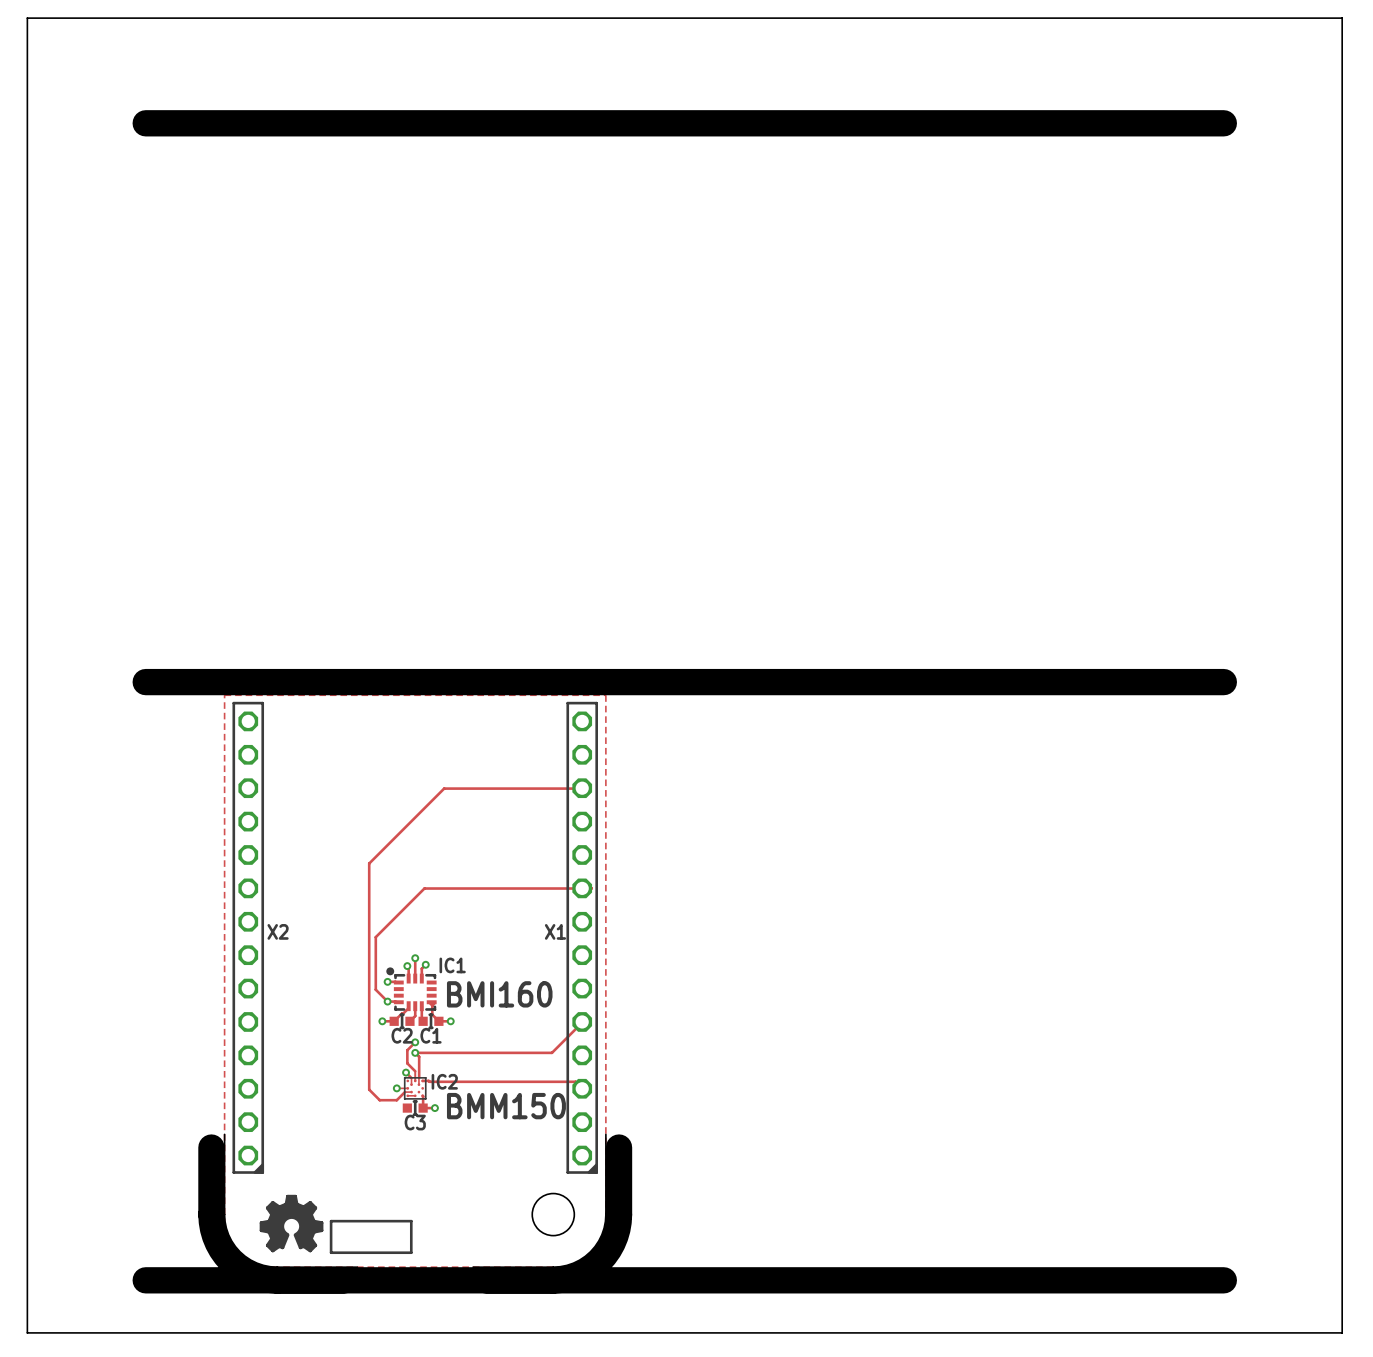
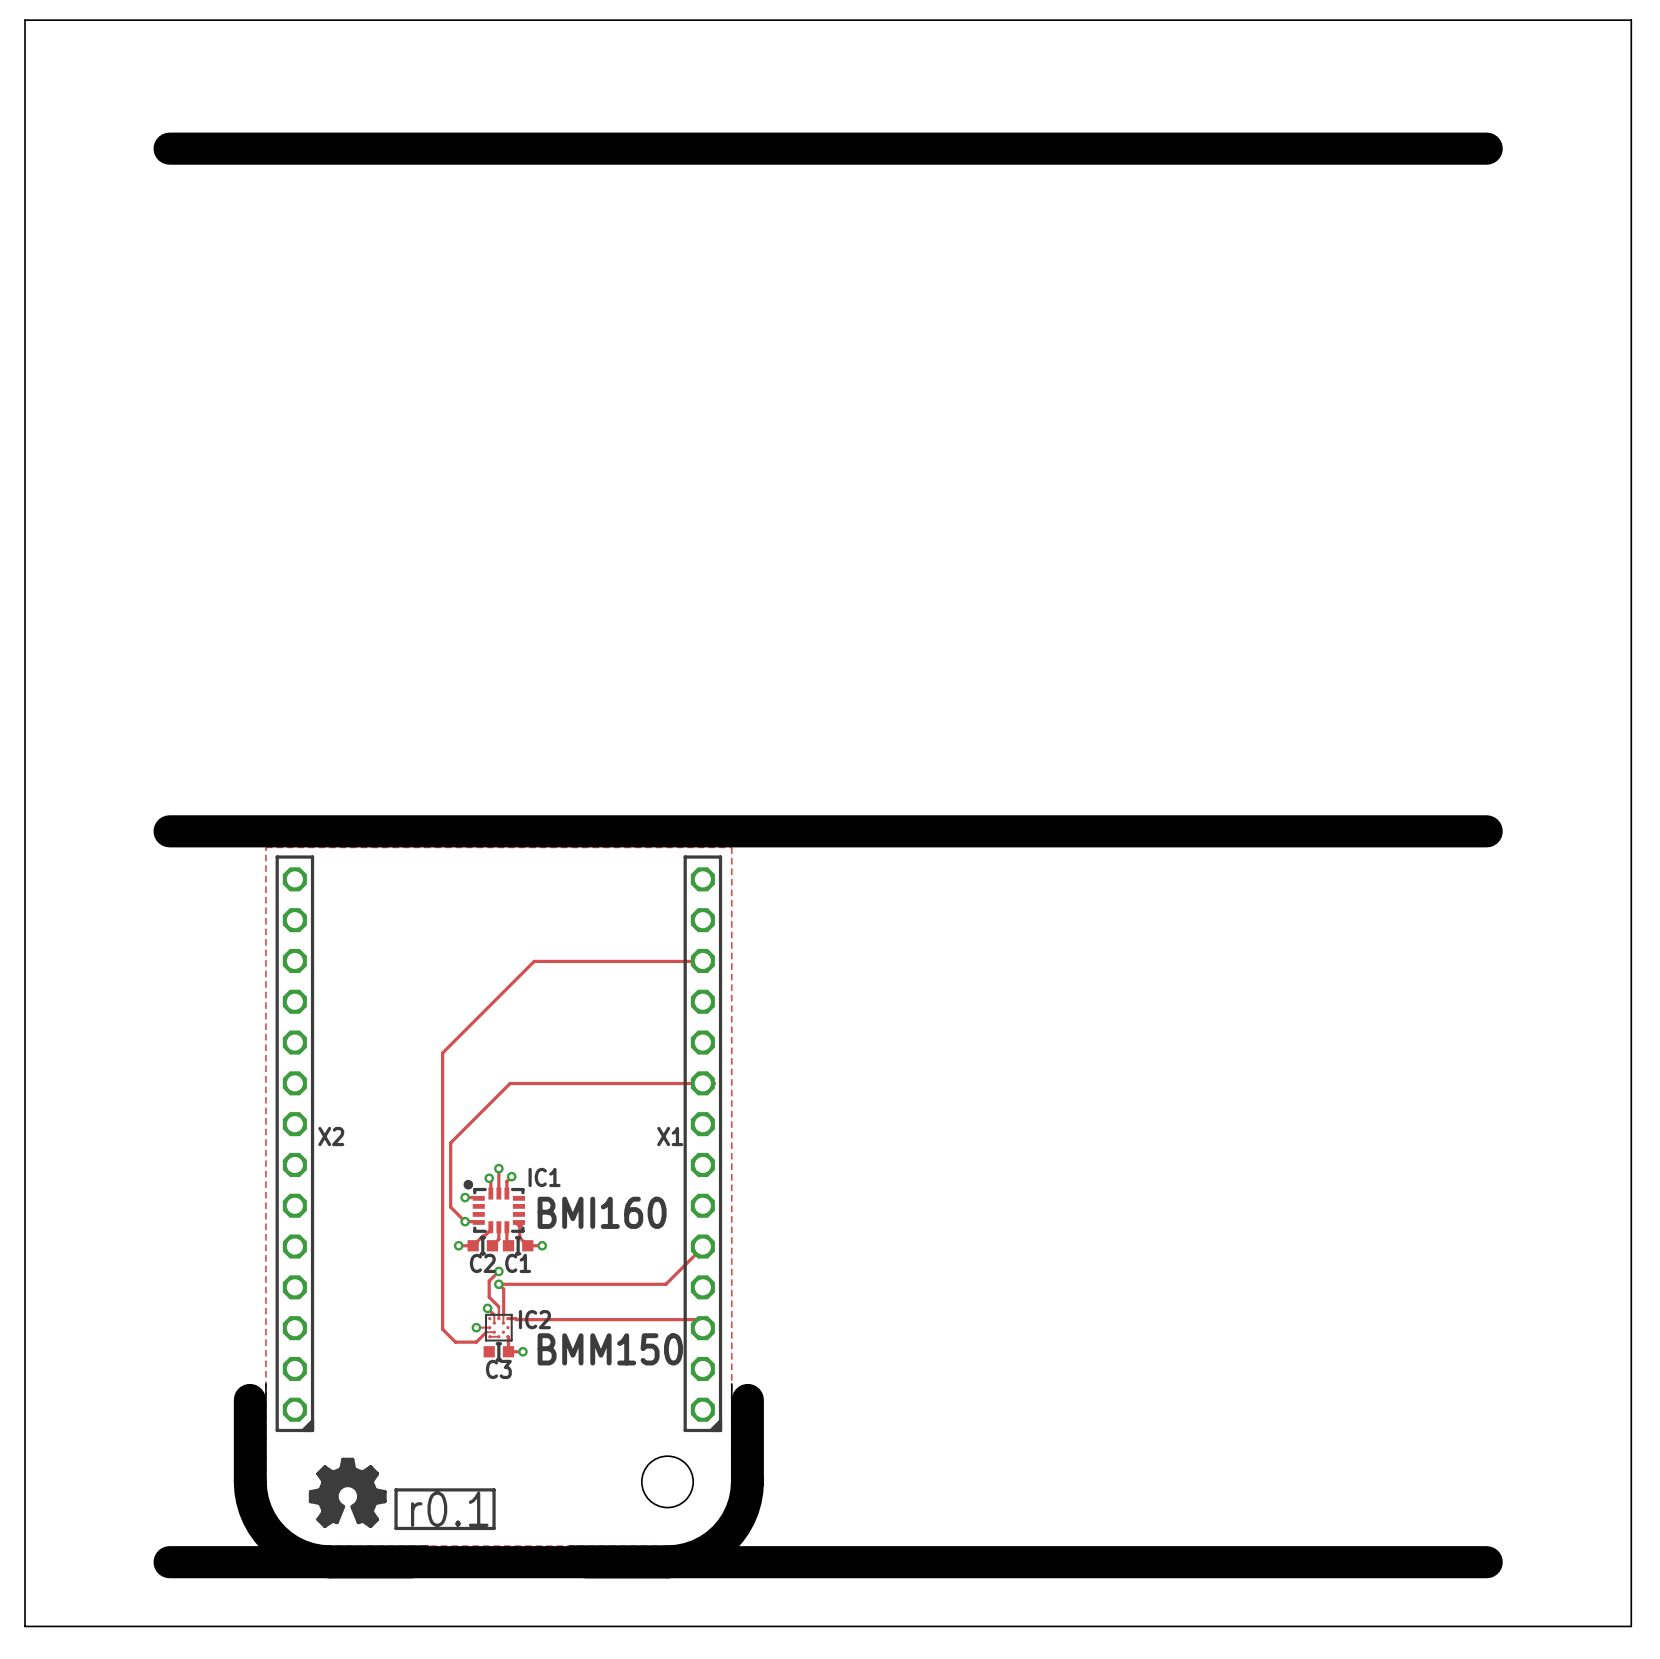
drawing shape: [329, 1219, 413, 1255] -> [394, 1488, 496, 1531]

